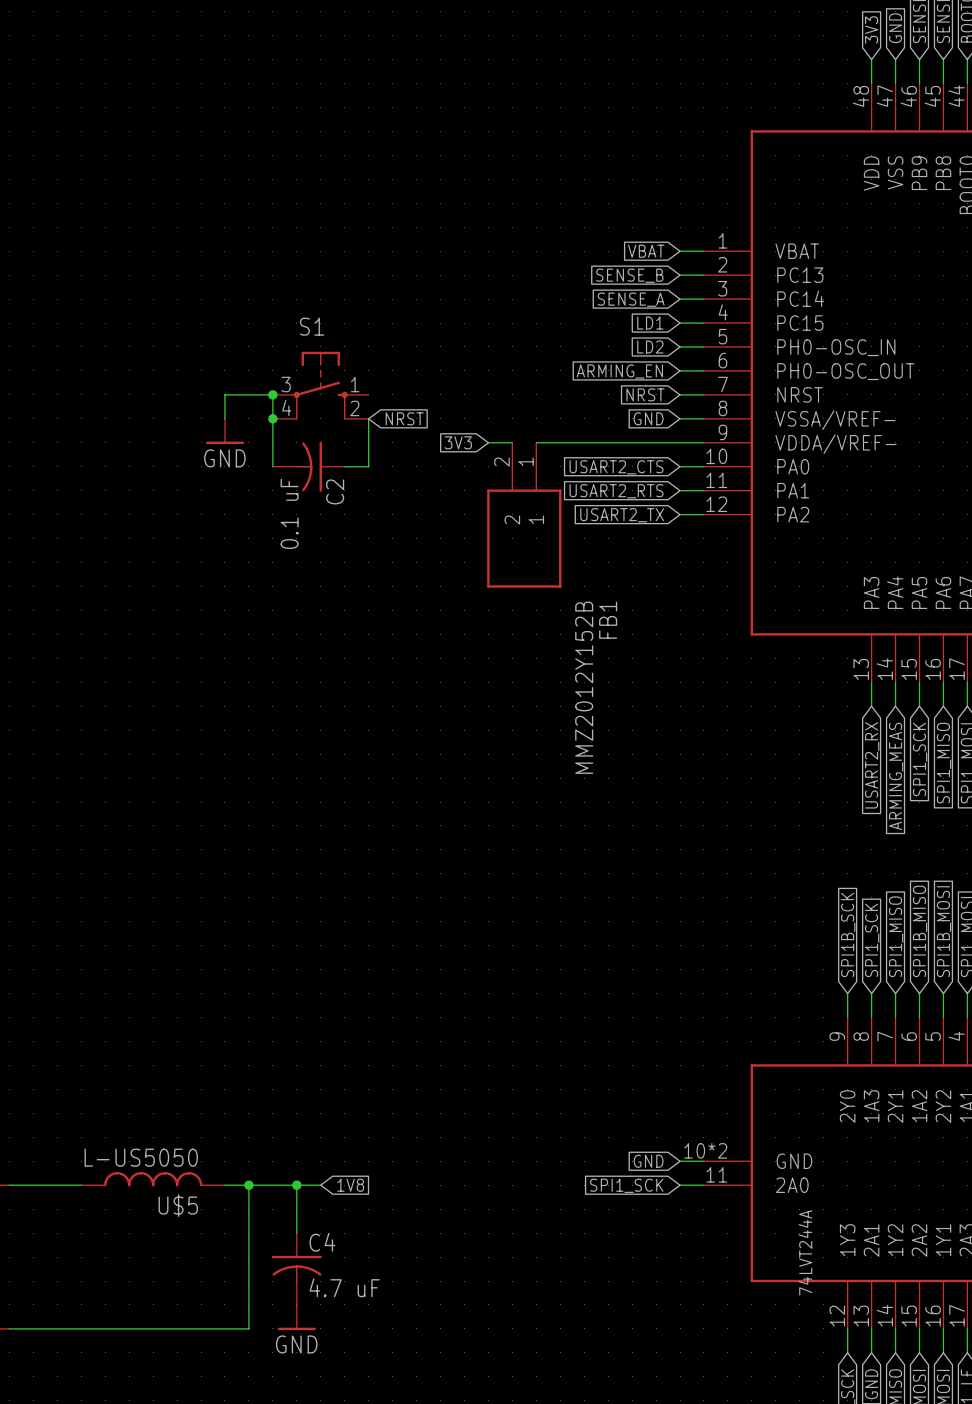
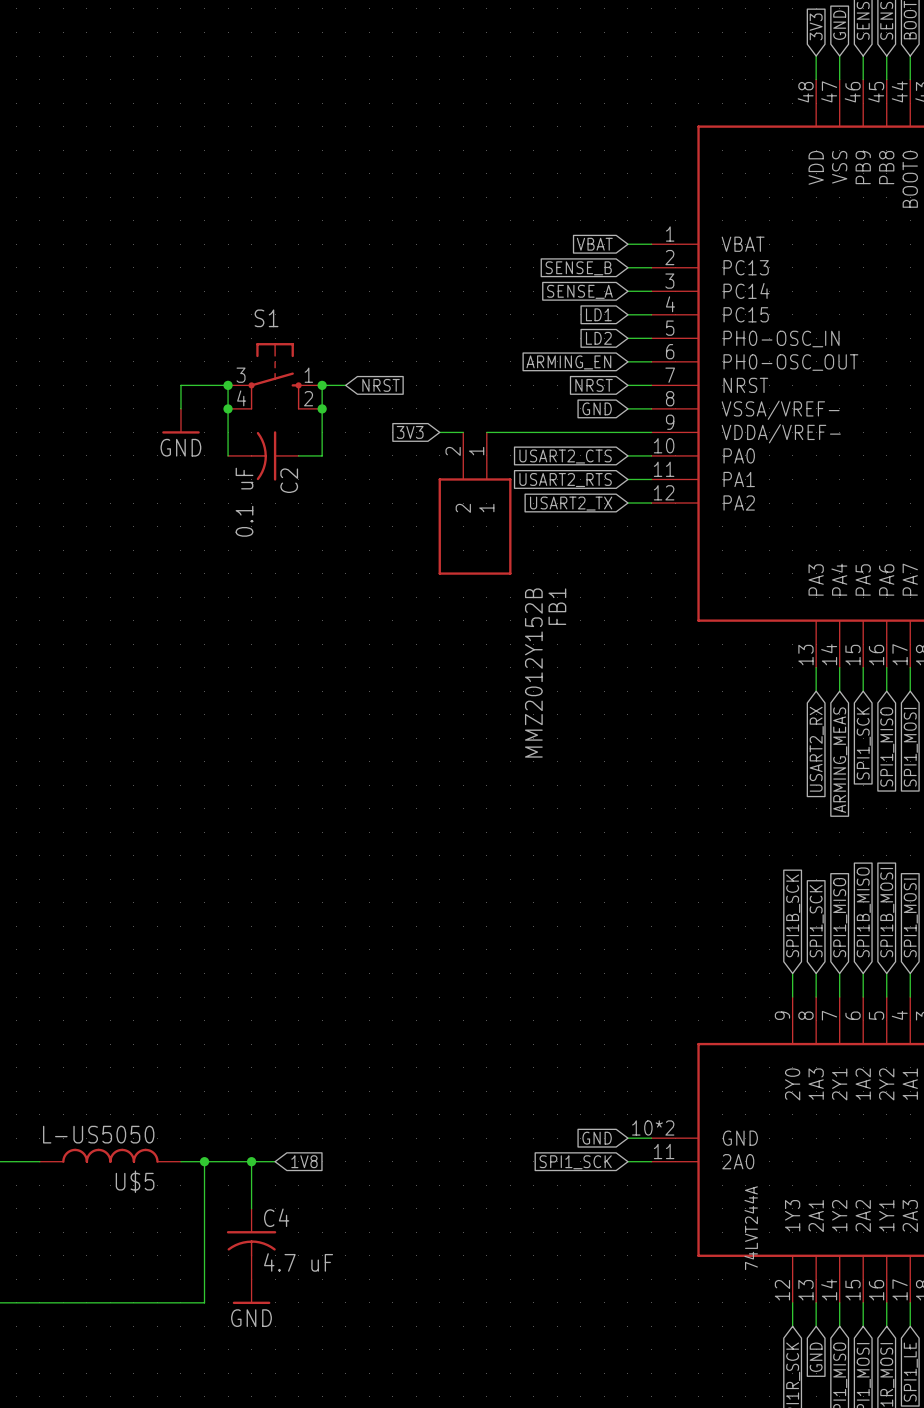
junction: none -> (322, 385)
wire: none -> (345, 385) (322, 385) (322, 408)
junction: none -> (322, 408)
global label position: NRST (404, 418) -> NRST (381, 385)

